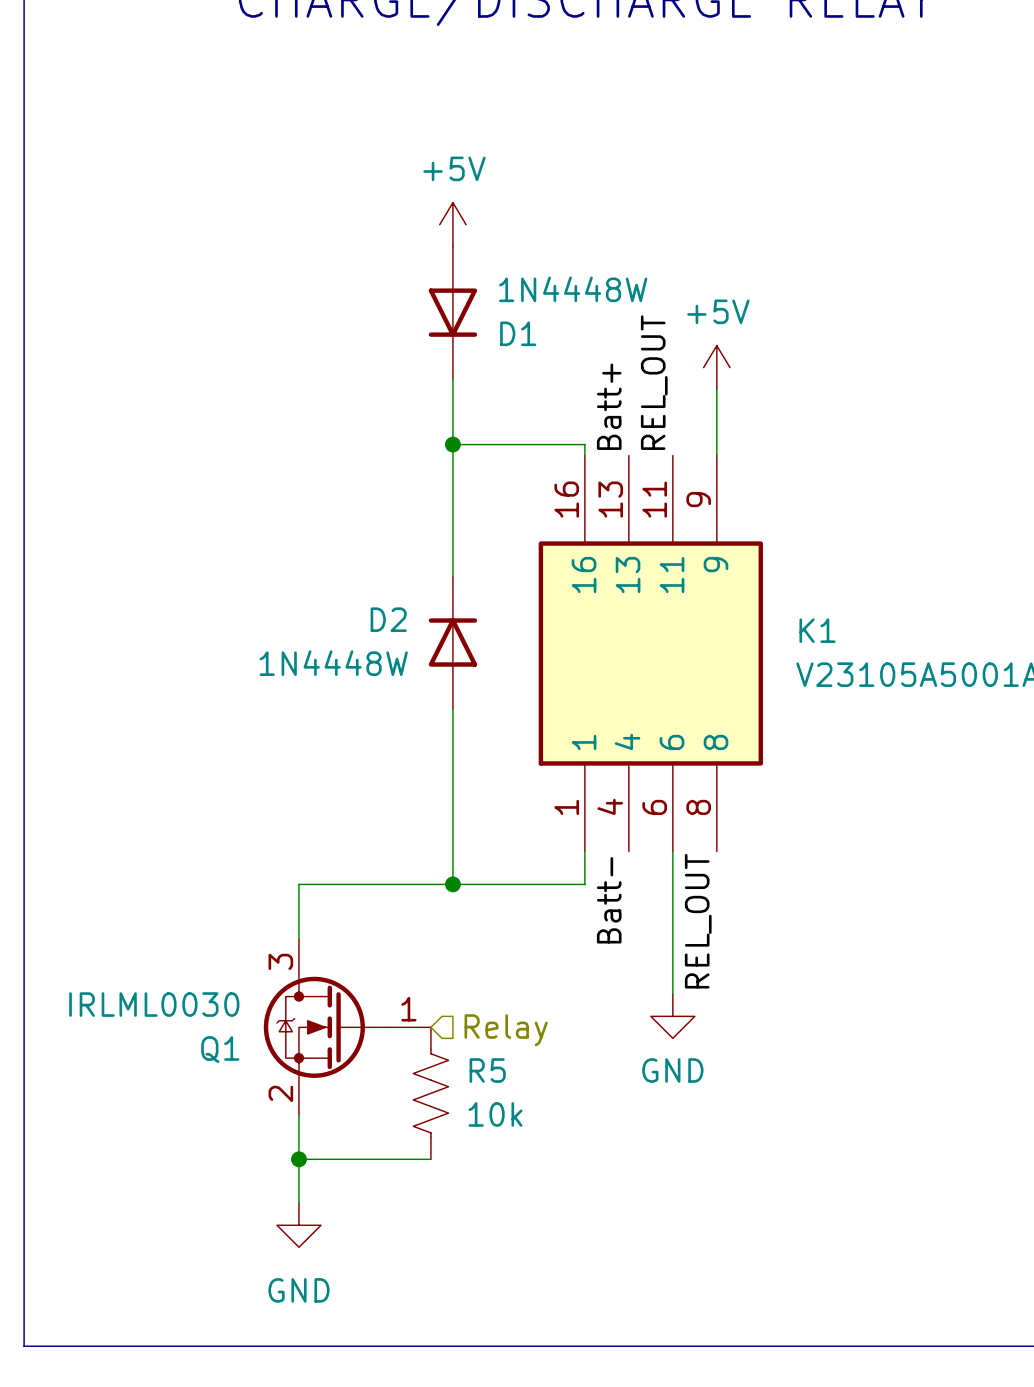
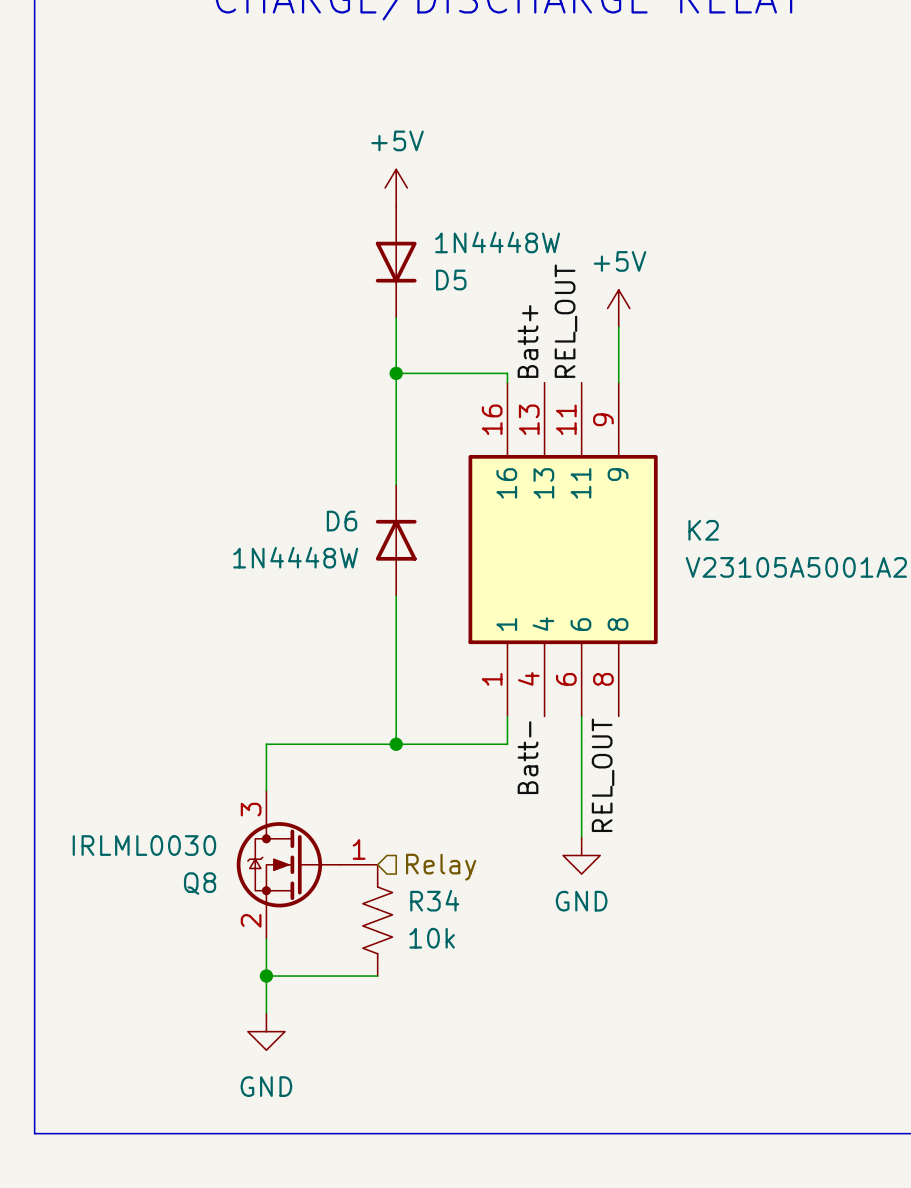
D1 name: D1 (518, 333) -> D5 (451, 279)
D2 name: D2 (388, 619) -> D6 (342, 521)
K1 name: K1 (817, 630) -> K2 (703, 530)
Q1 name: Q1 (220, 1049) -> Q8 (200, 883)
R5 name: R5 (487, 1070) -> R34 (434, 900)

